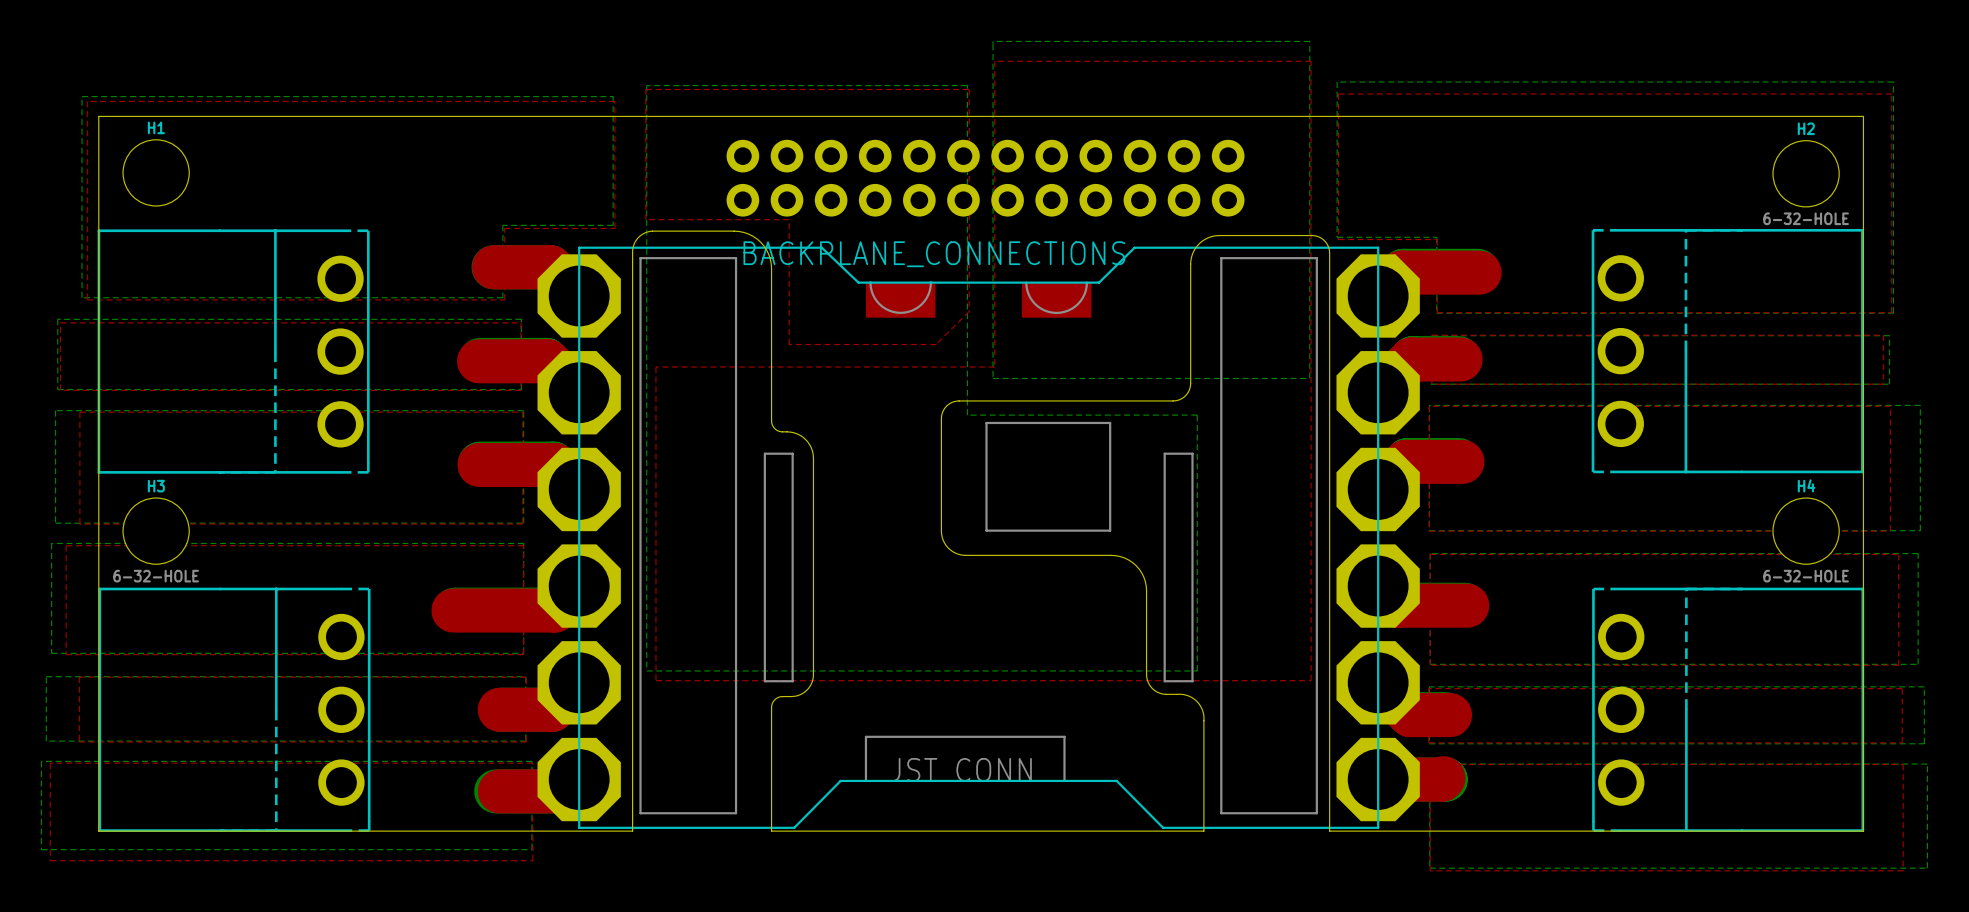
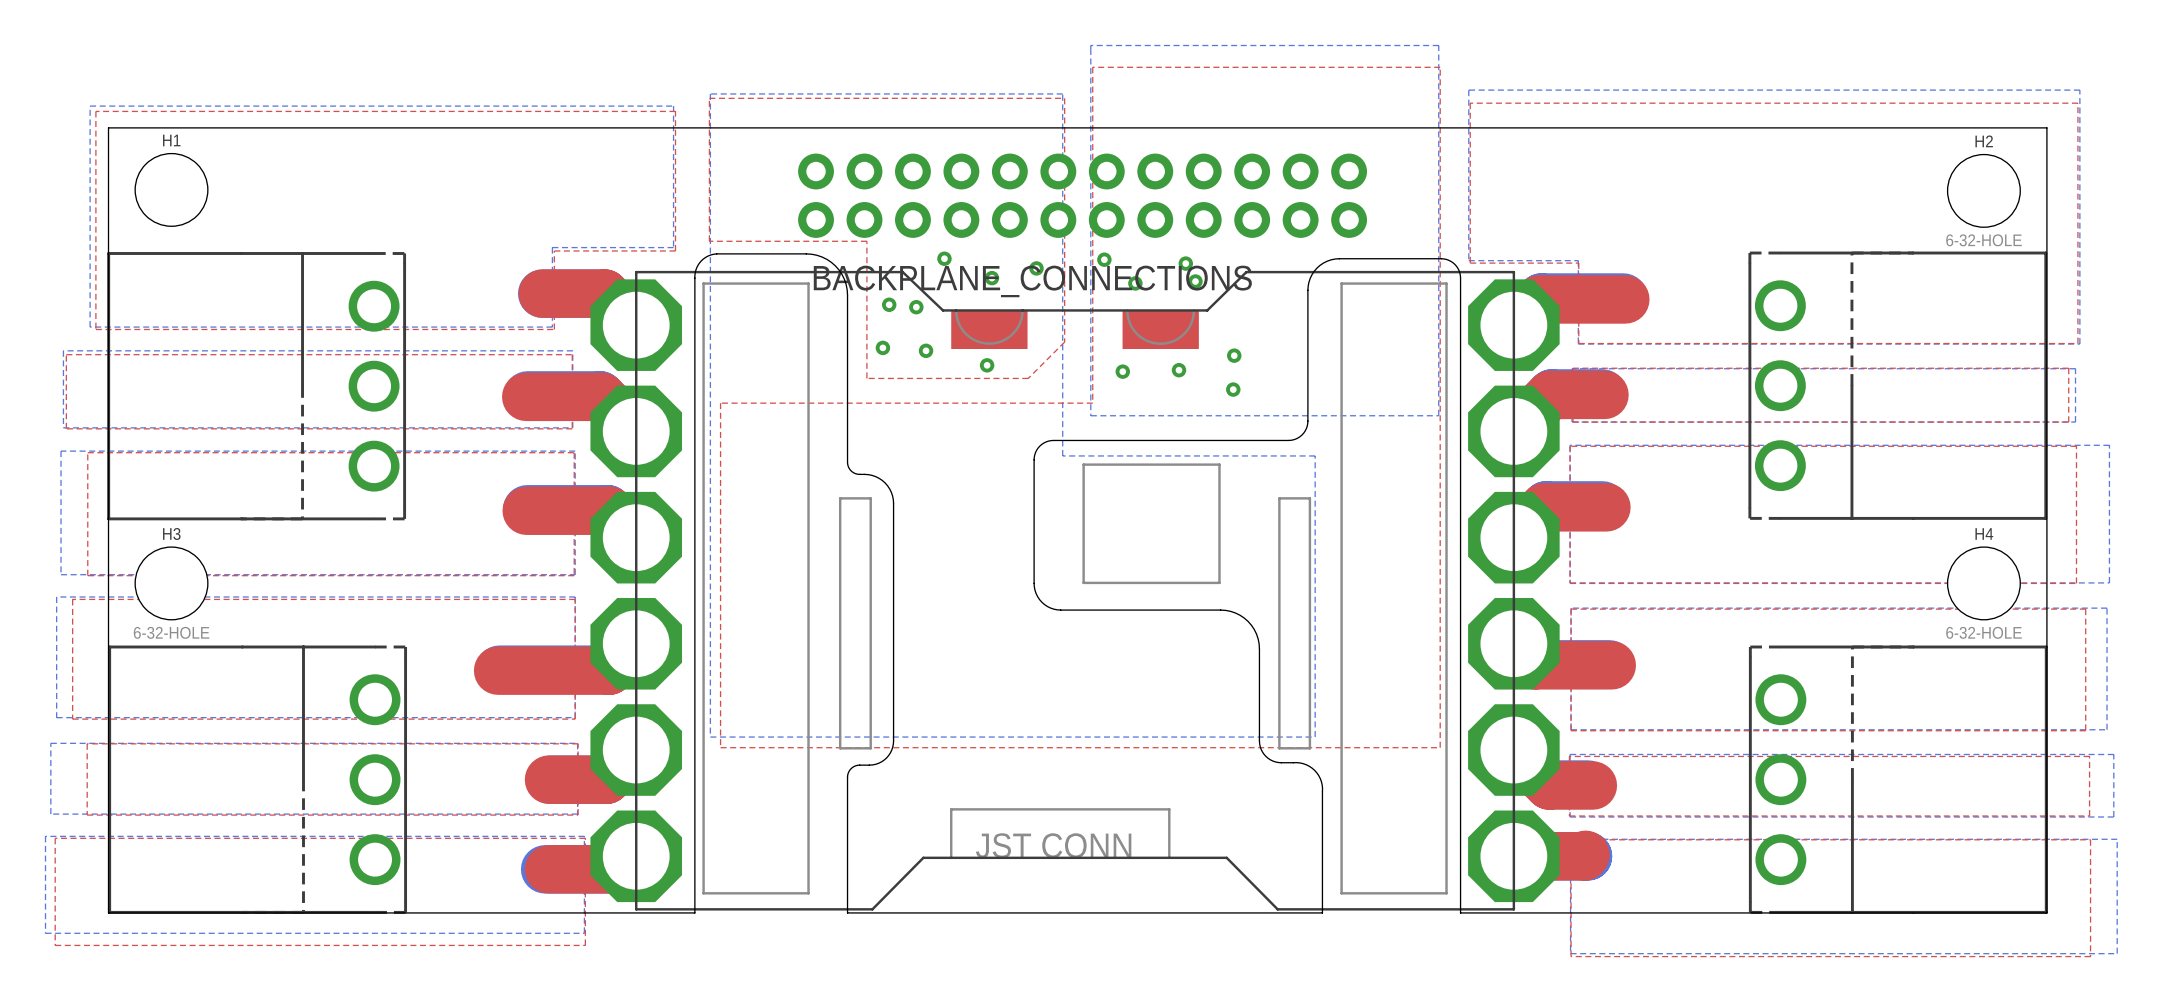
via: none -> (944, 258)
via: none -> (1104, 259)
via: none -> (1185, 263)
via: none -> (1036, 268)
via: none -> (991, 278)
via: none -> (1195, 281)
via: none -> (1135, 283)
via: none -> (889, 304)
via: none -> (916, 307)
via: none -> (882, 347)
via: none -> (926, 350)
via: none -> (1234, 355)
via: none -> (987, 365)
via: none -> (1179, 370)
via: none -> (1122, 371)
via: none -> (1233, 389)

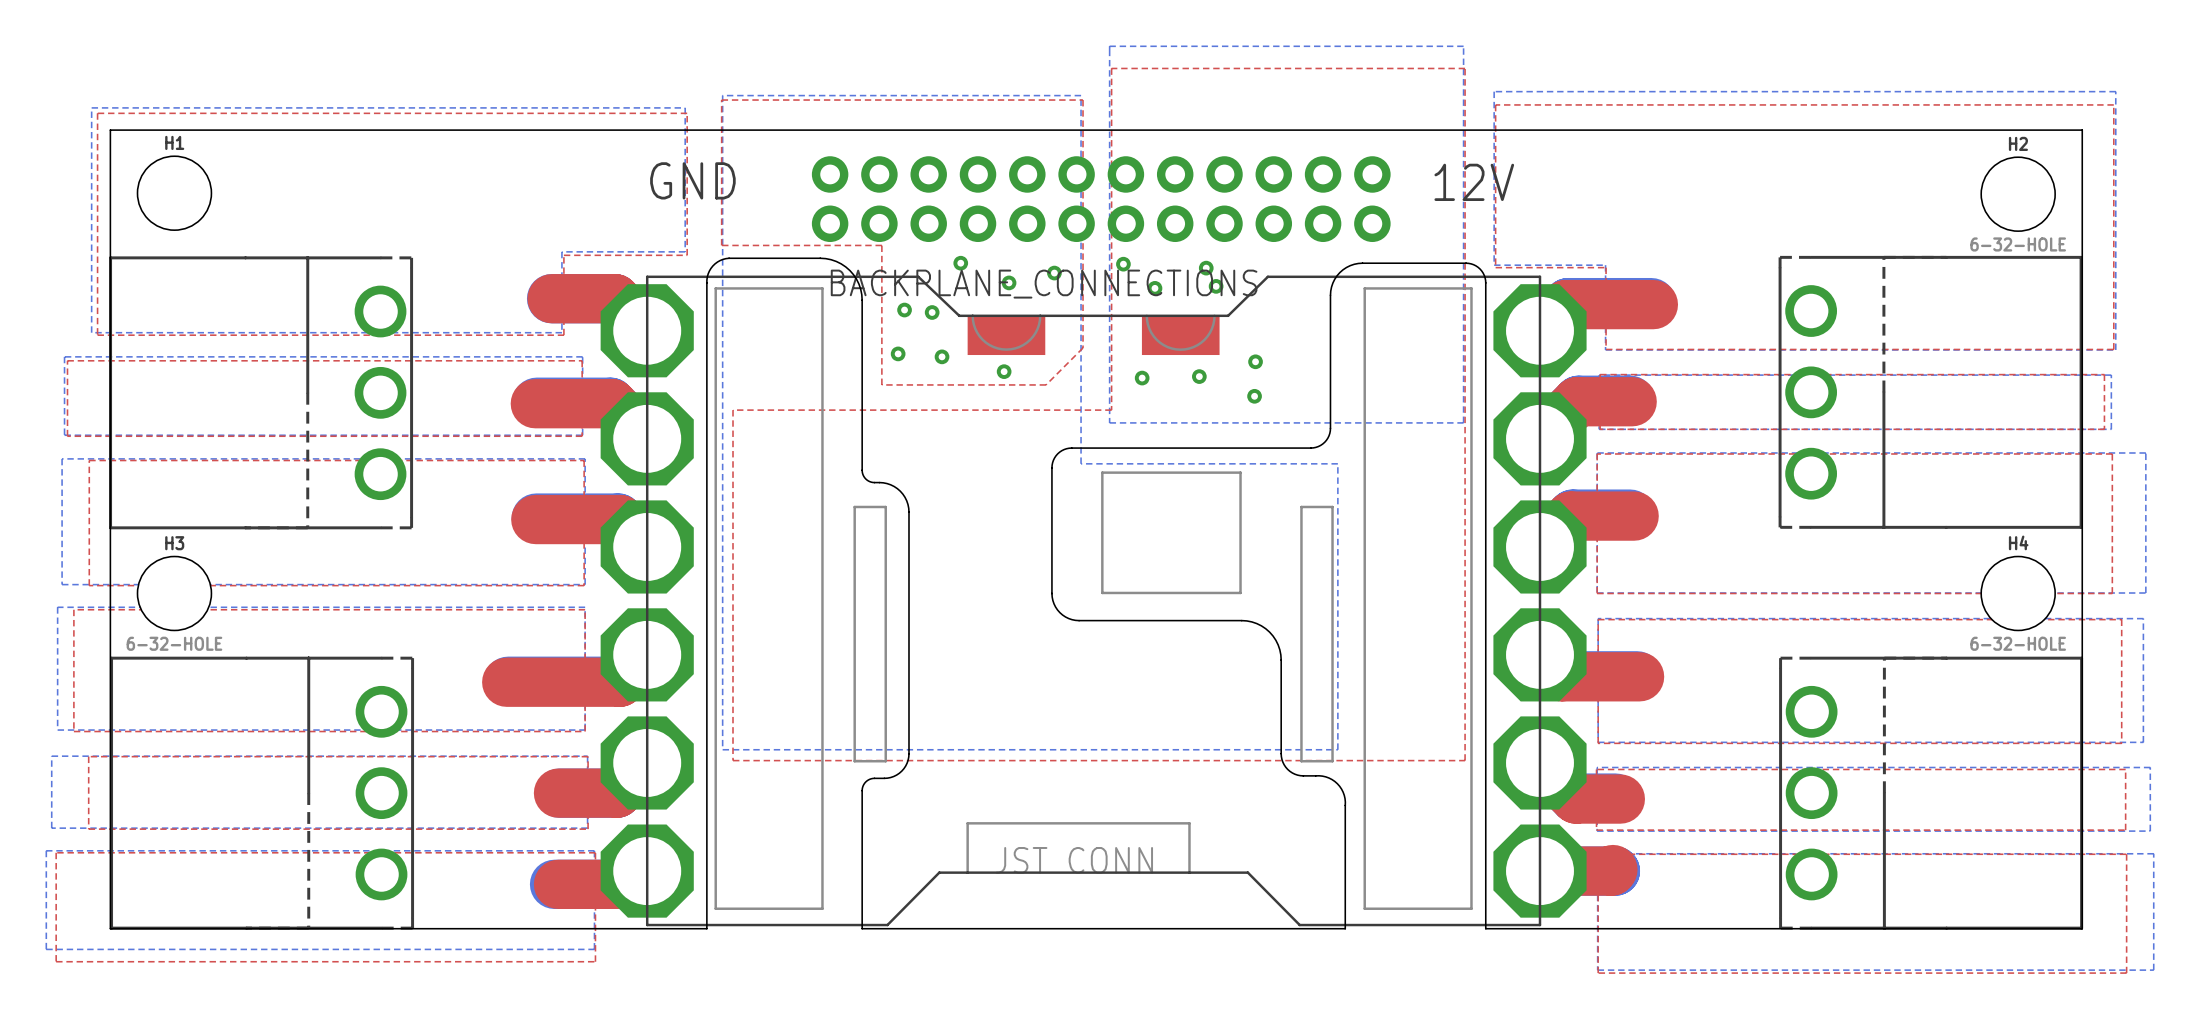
text: none -> GND (692, 180)
text: none -> 12V (1474, 182)

